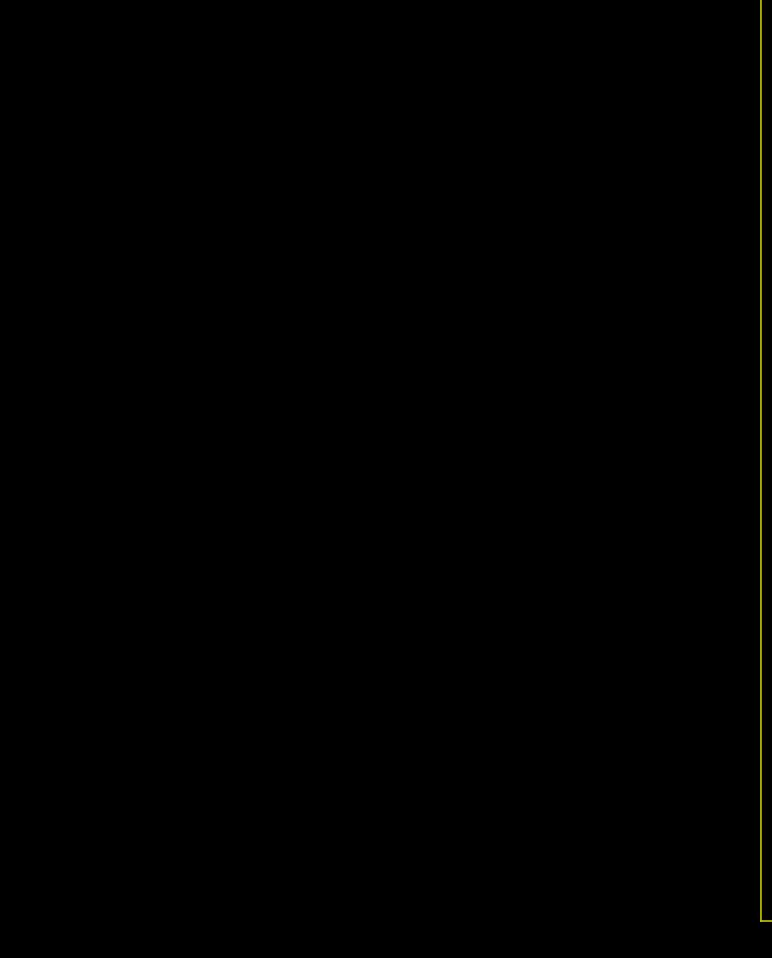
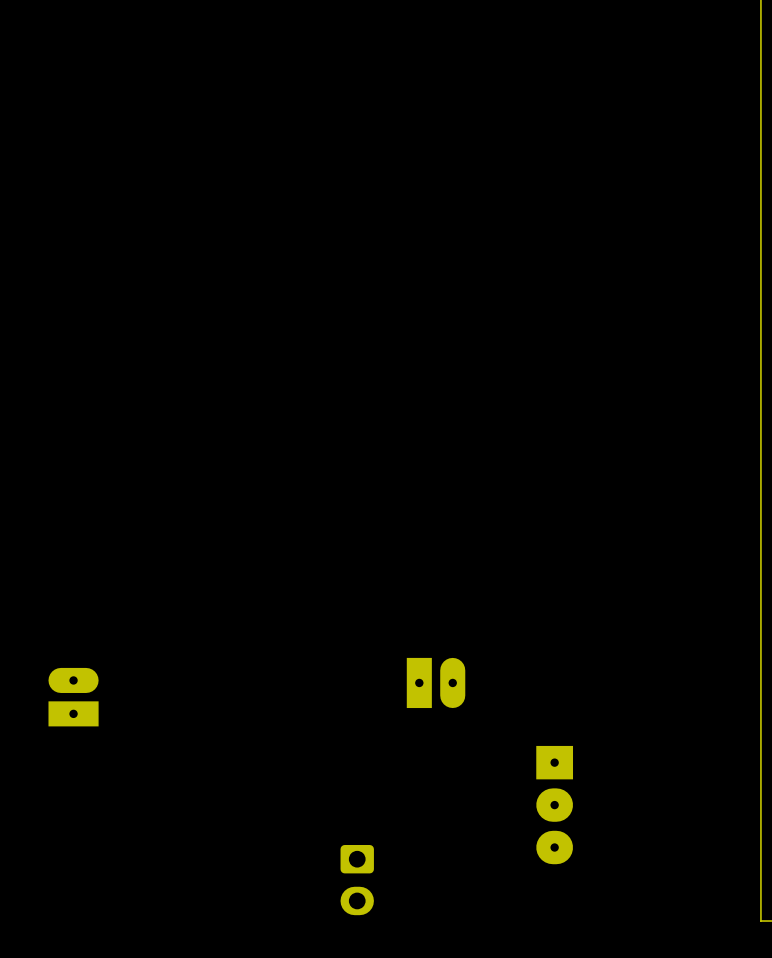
part: none -> (436, 682)
part: none -> (73, 697)
part: none -> (554, 805)
part: none -> (357, 880)

